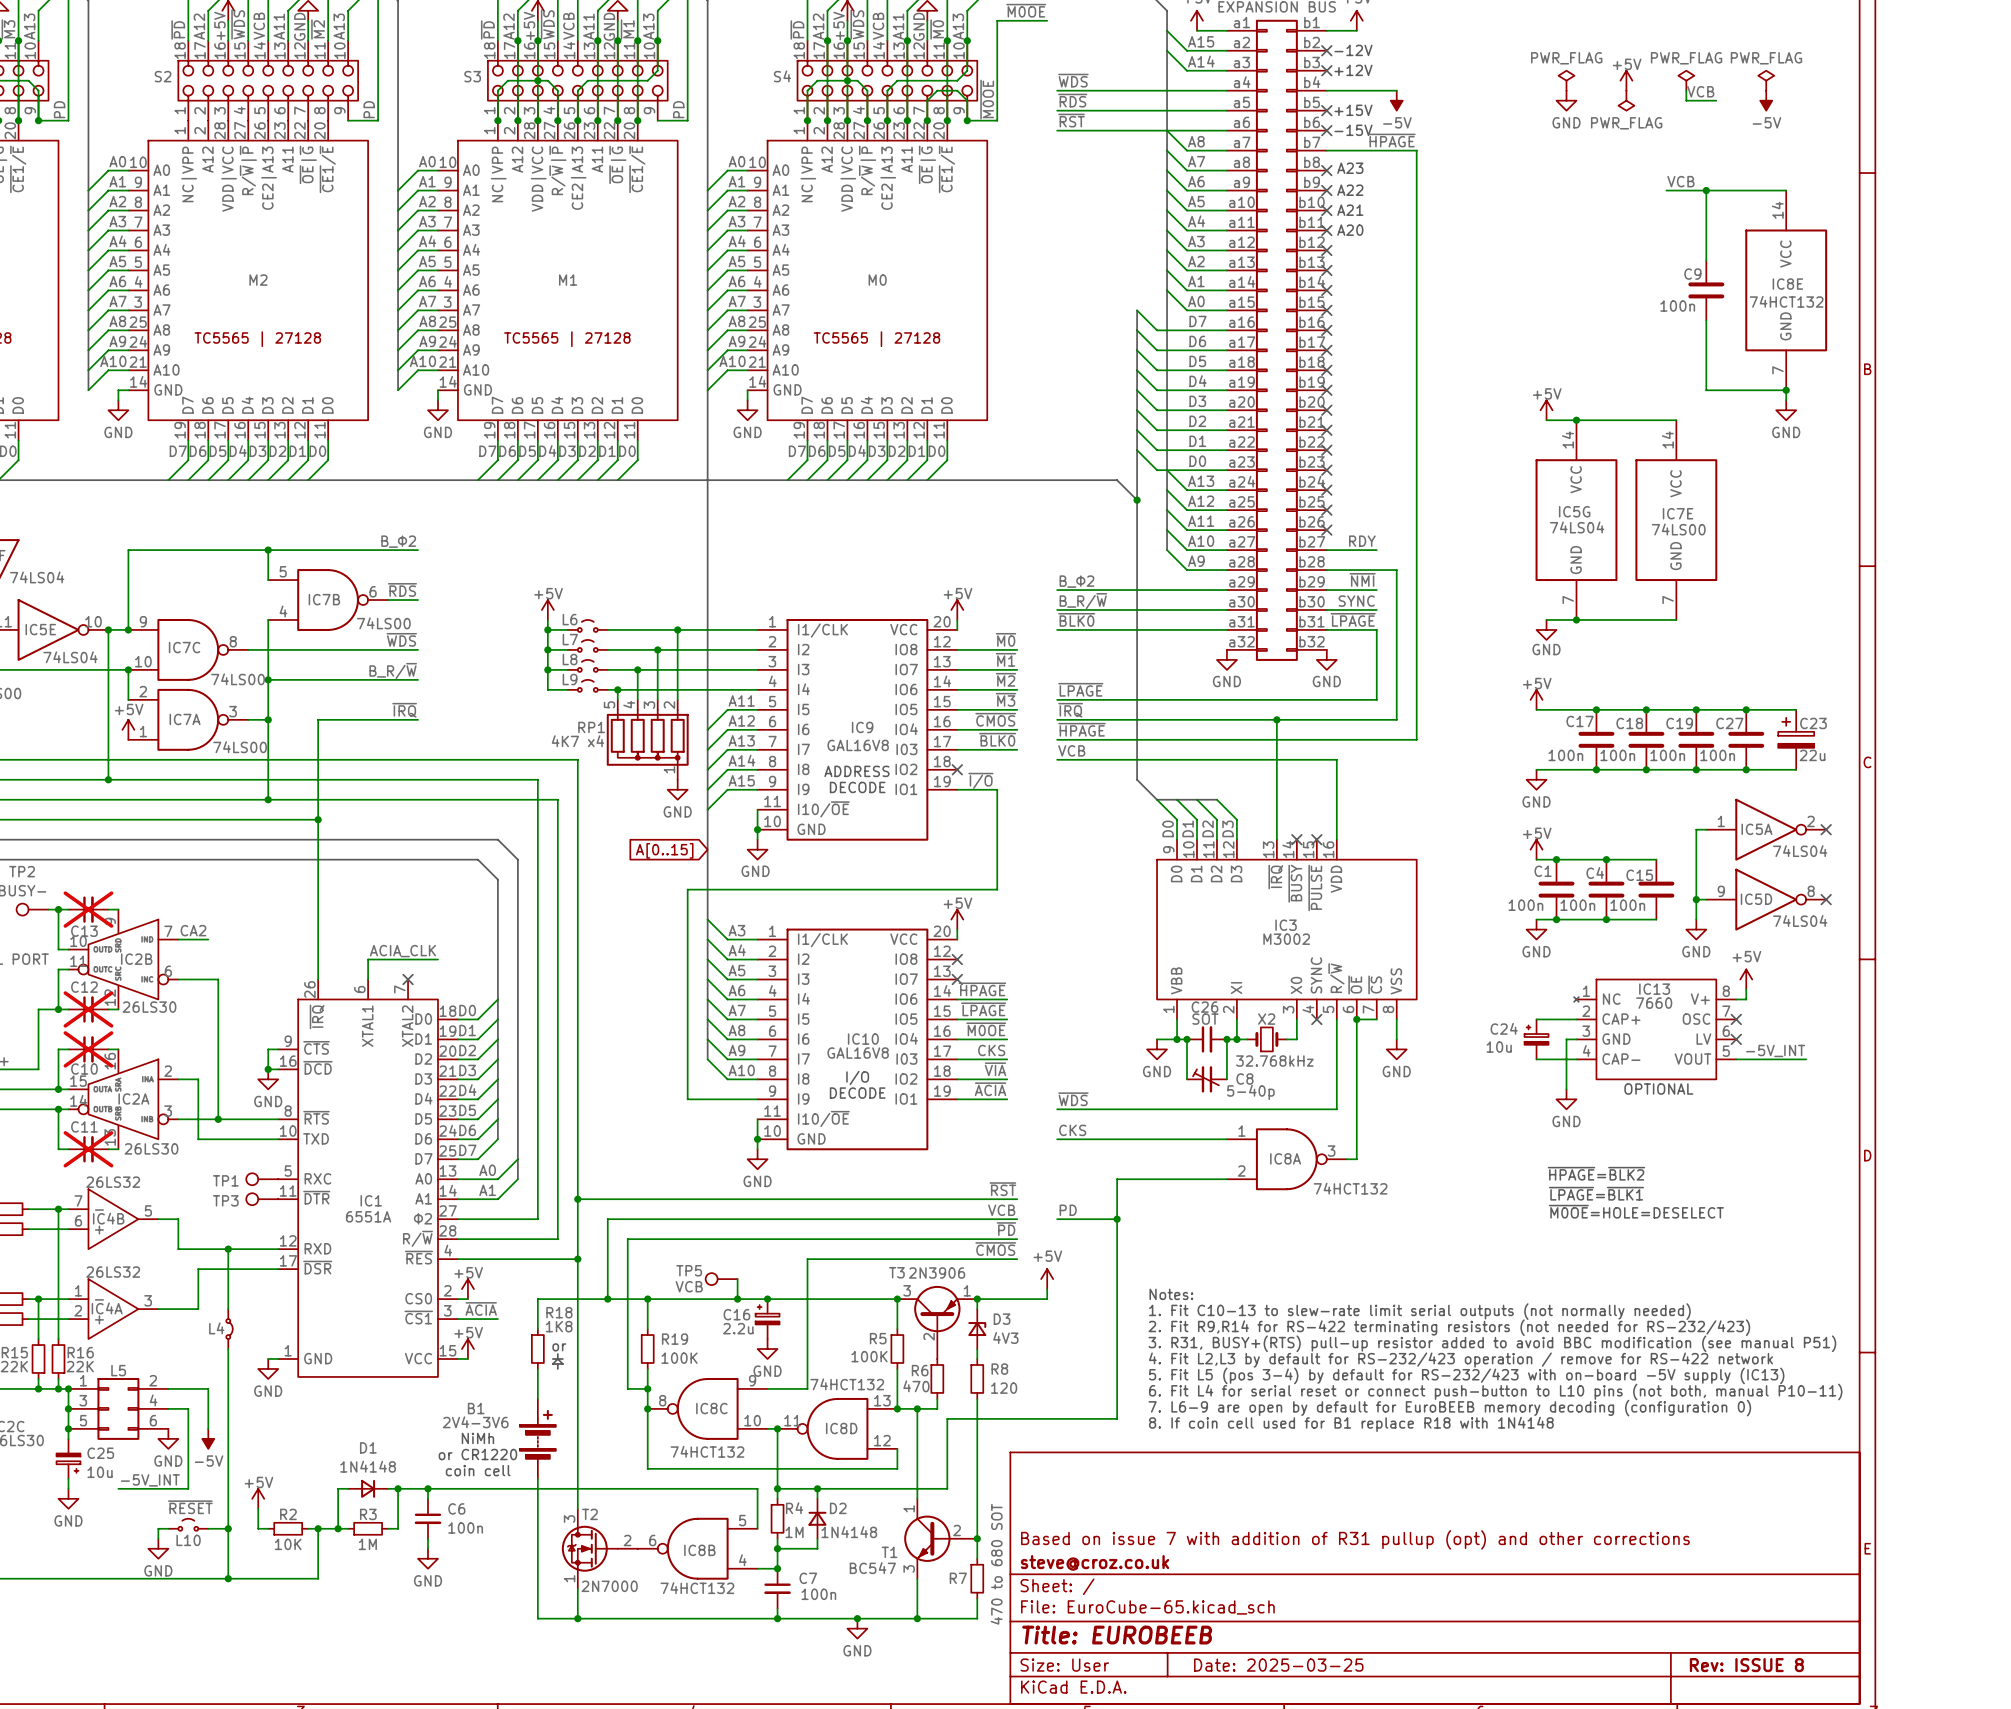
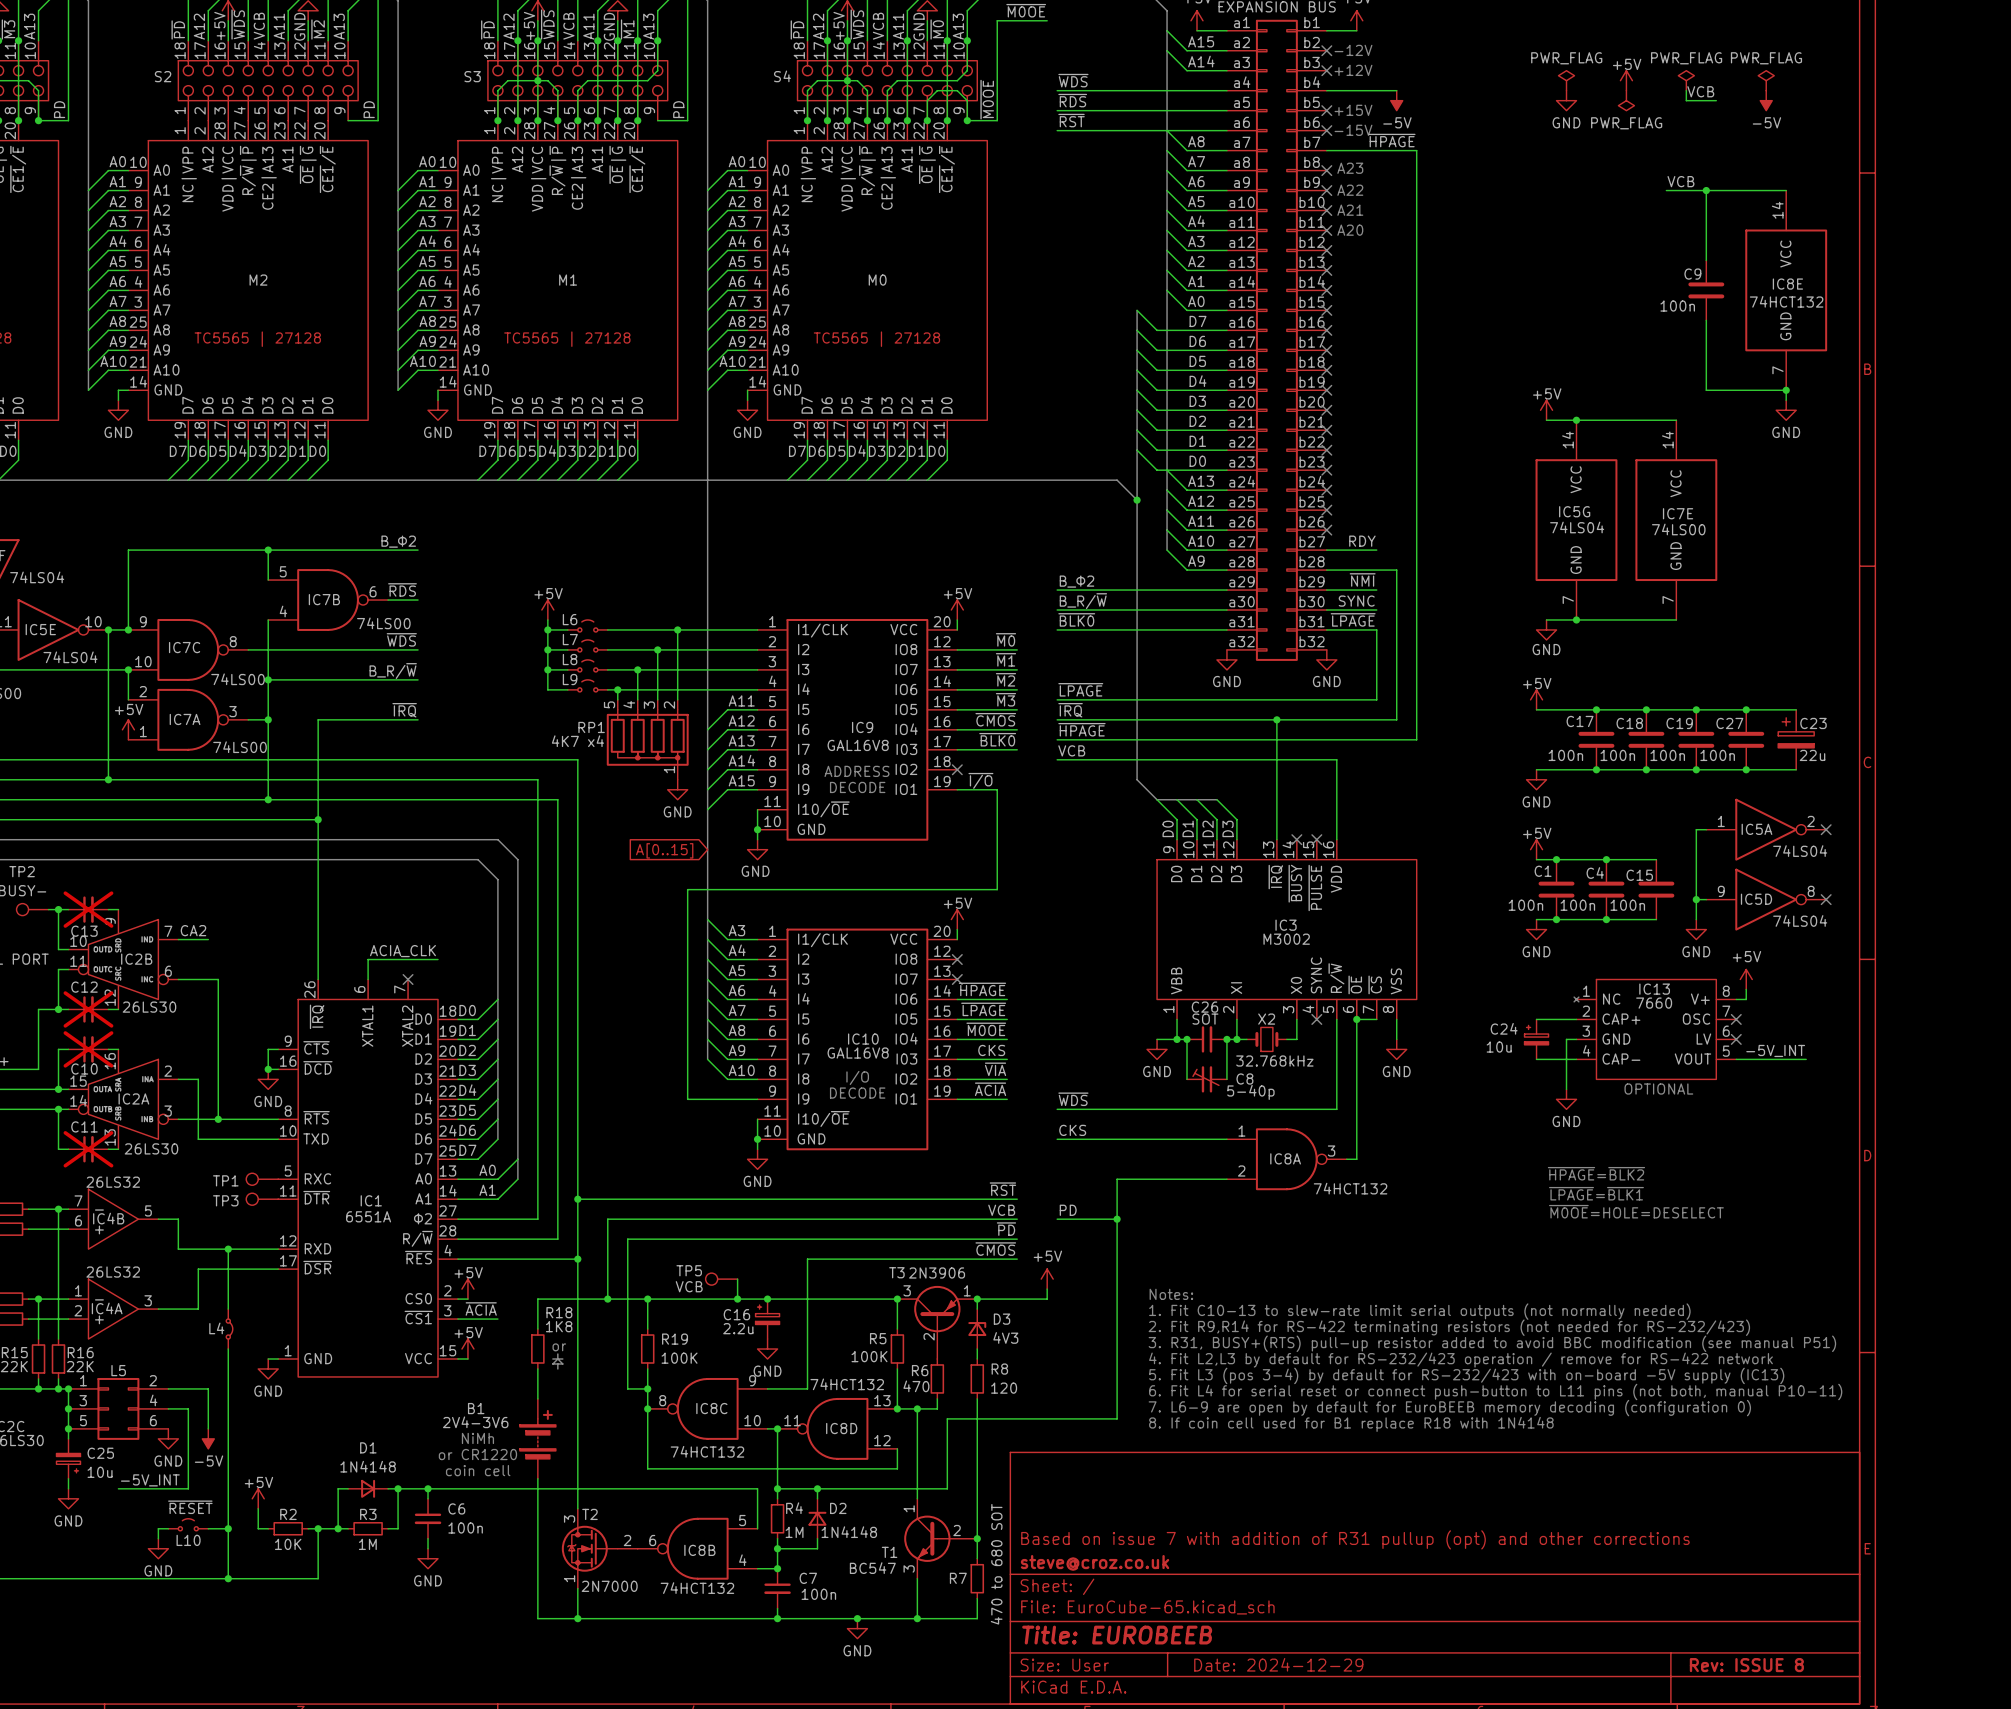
text: 5. Fit L5 (pos 3-4) by default for RS-232/423 with on-board -5V supply (IC13) (1466, 1375) -> 5. Fit L3 (pos 3-4) by default for RS-232/423 with on-board -5V supply (IC13) (1466, 1375)
text: 6. Fit L4 for serial reset or connect push-button to L10 pins (not both, manual P10-11) (1495, 1392) -> 6. Fit L4 for serial reset or connect push-button to L11 pins (not both, manual P10-11) (1495, 1392)
title block: Date: 2025-03-25 (1278, 1665) -> Date: 2024-12-29 (1278, 1664)

